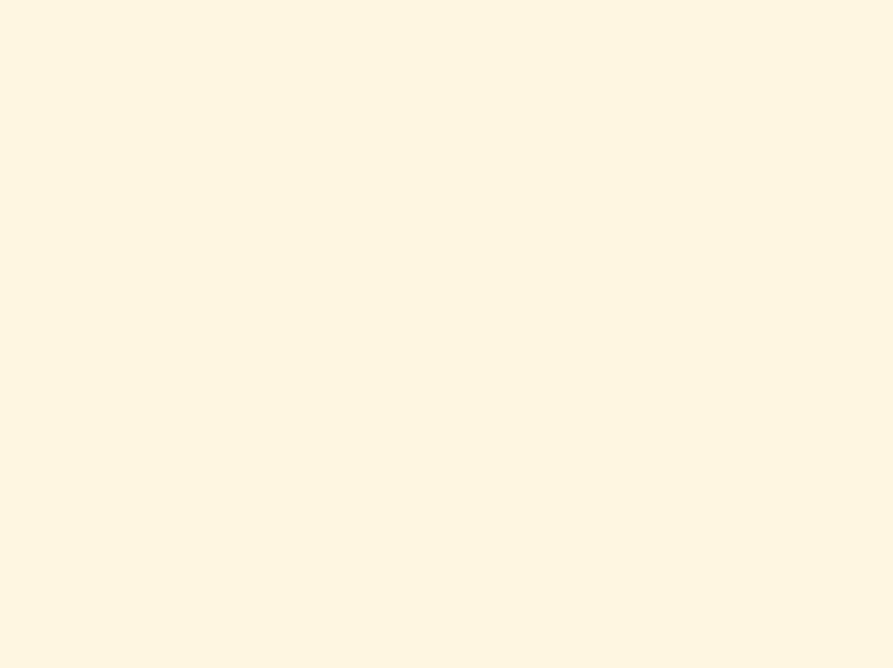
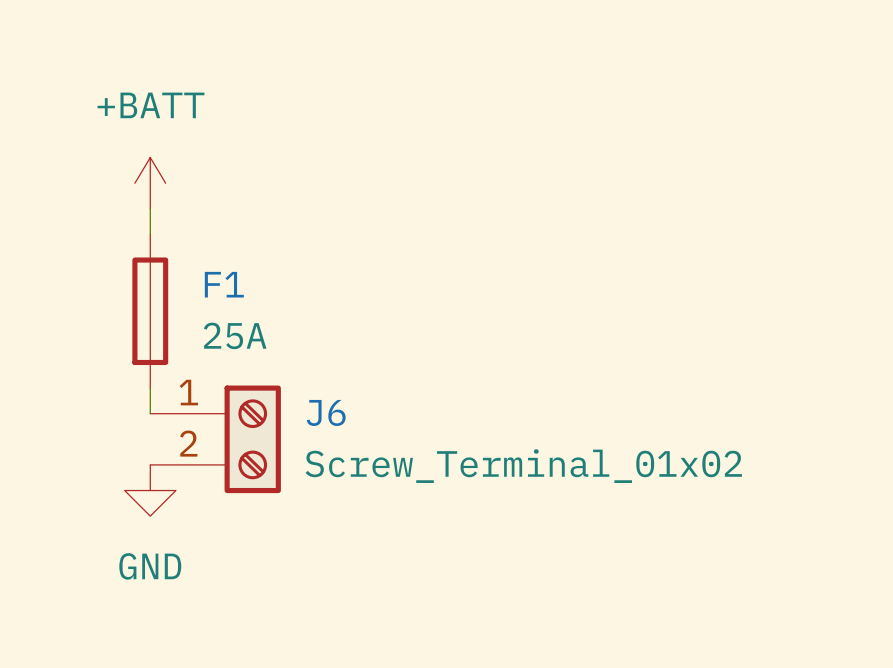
power symbol: none -> +BATT (150, 183)
wire: none -> (150, 208) (150, 234)
F1: none -> 25A (150, 311)
wire: none -> (150, 388) (150, 413)
J6: none -> Screw_Terminal_01x02 (215, 439)
power symbol: none -> GND (150, 490)

